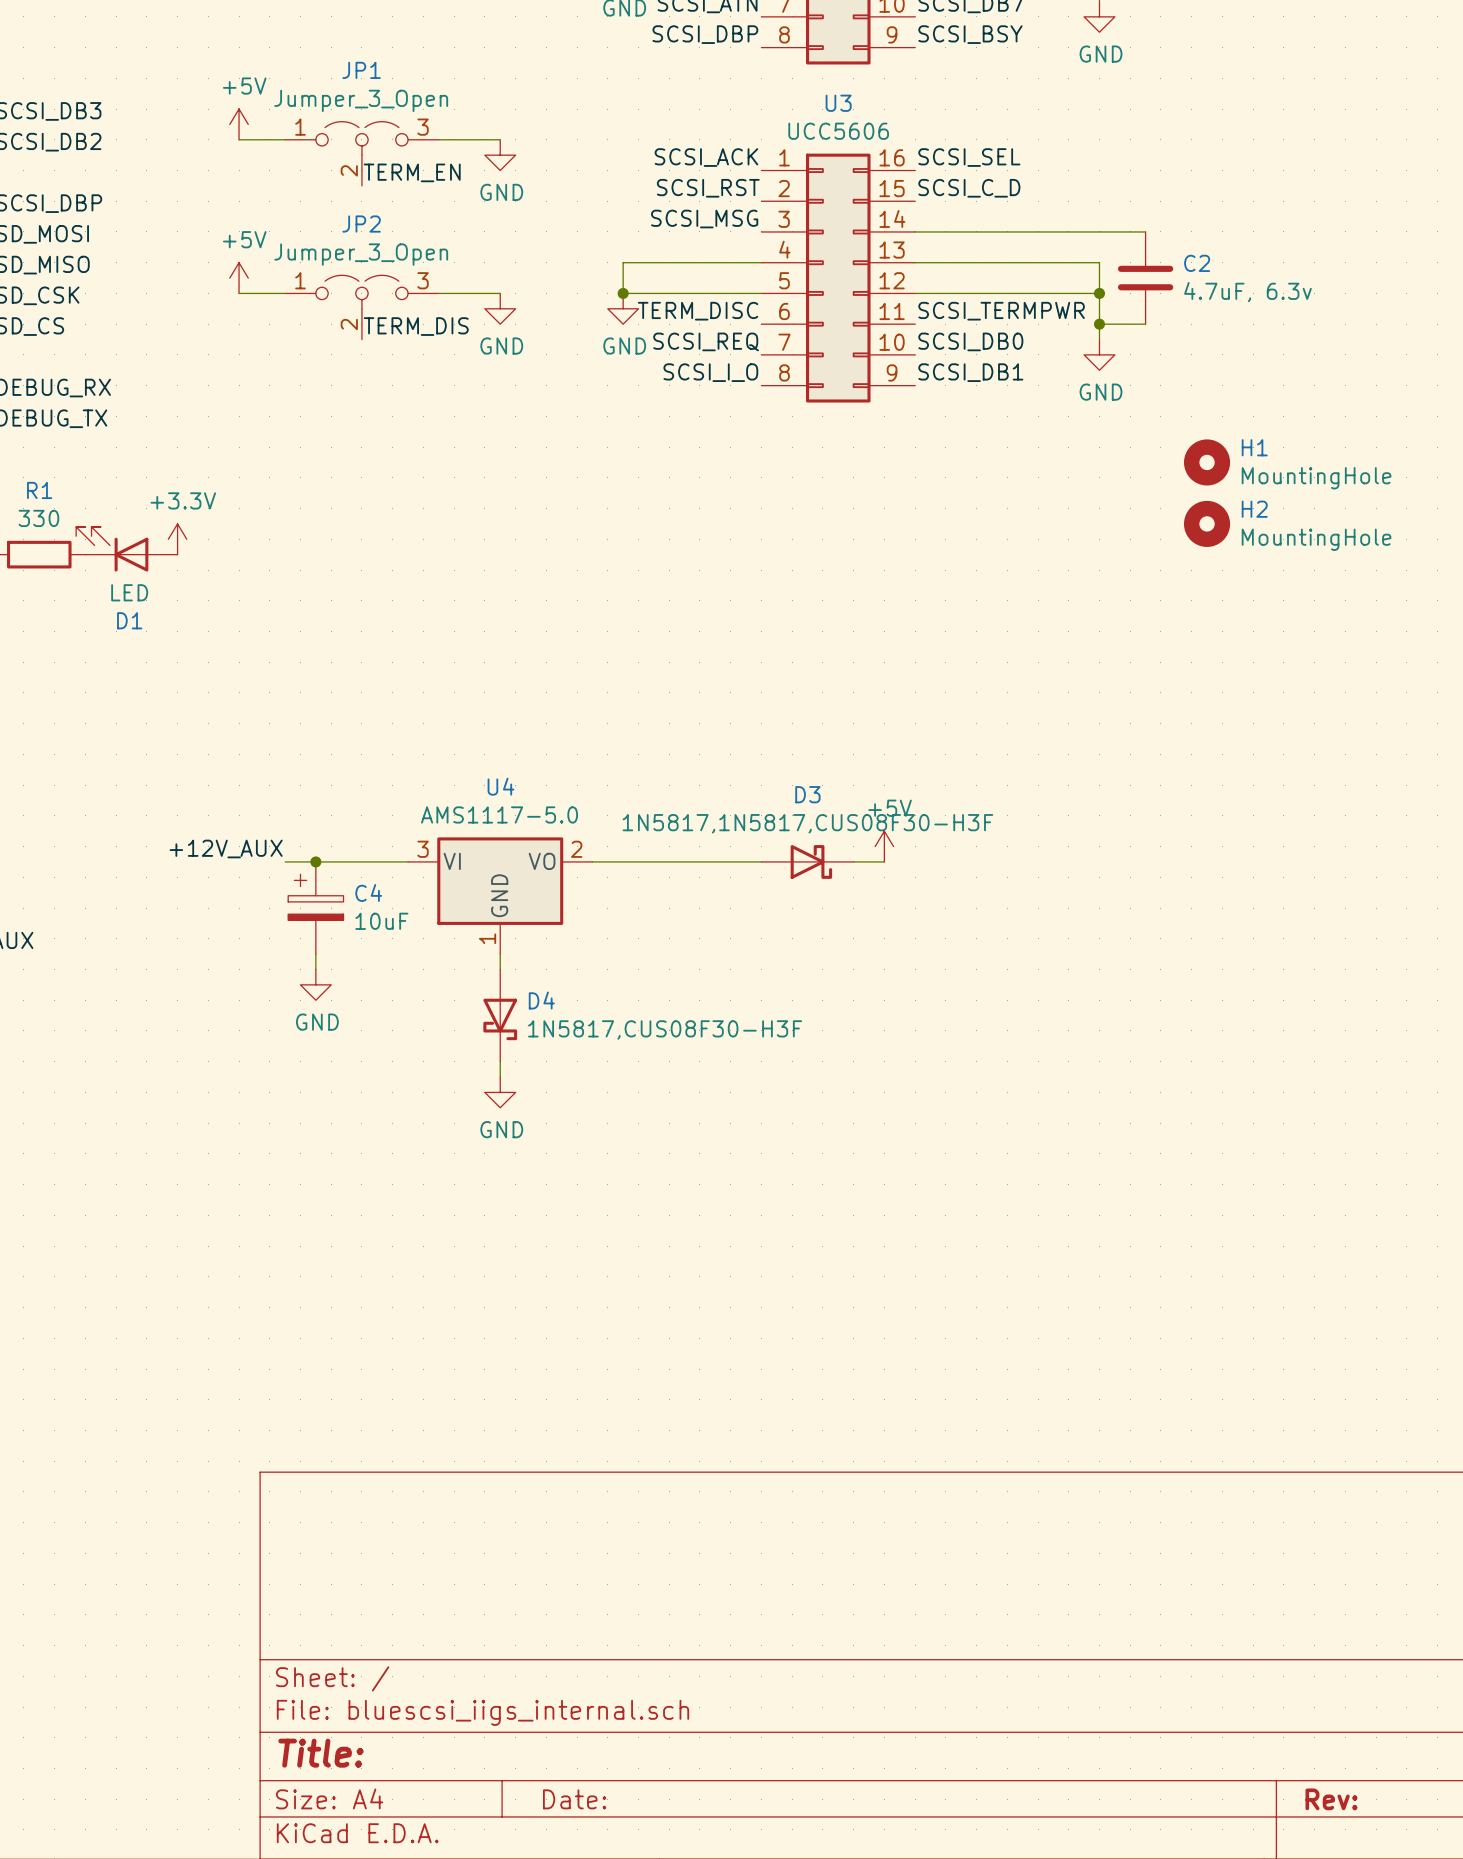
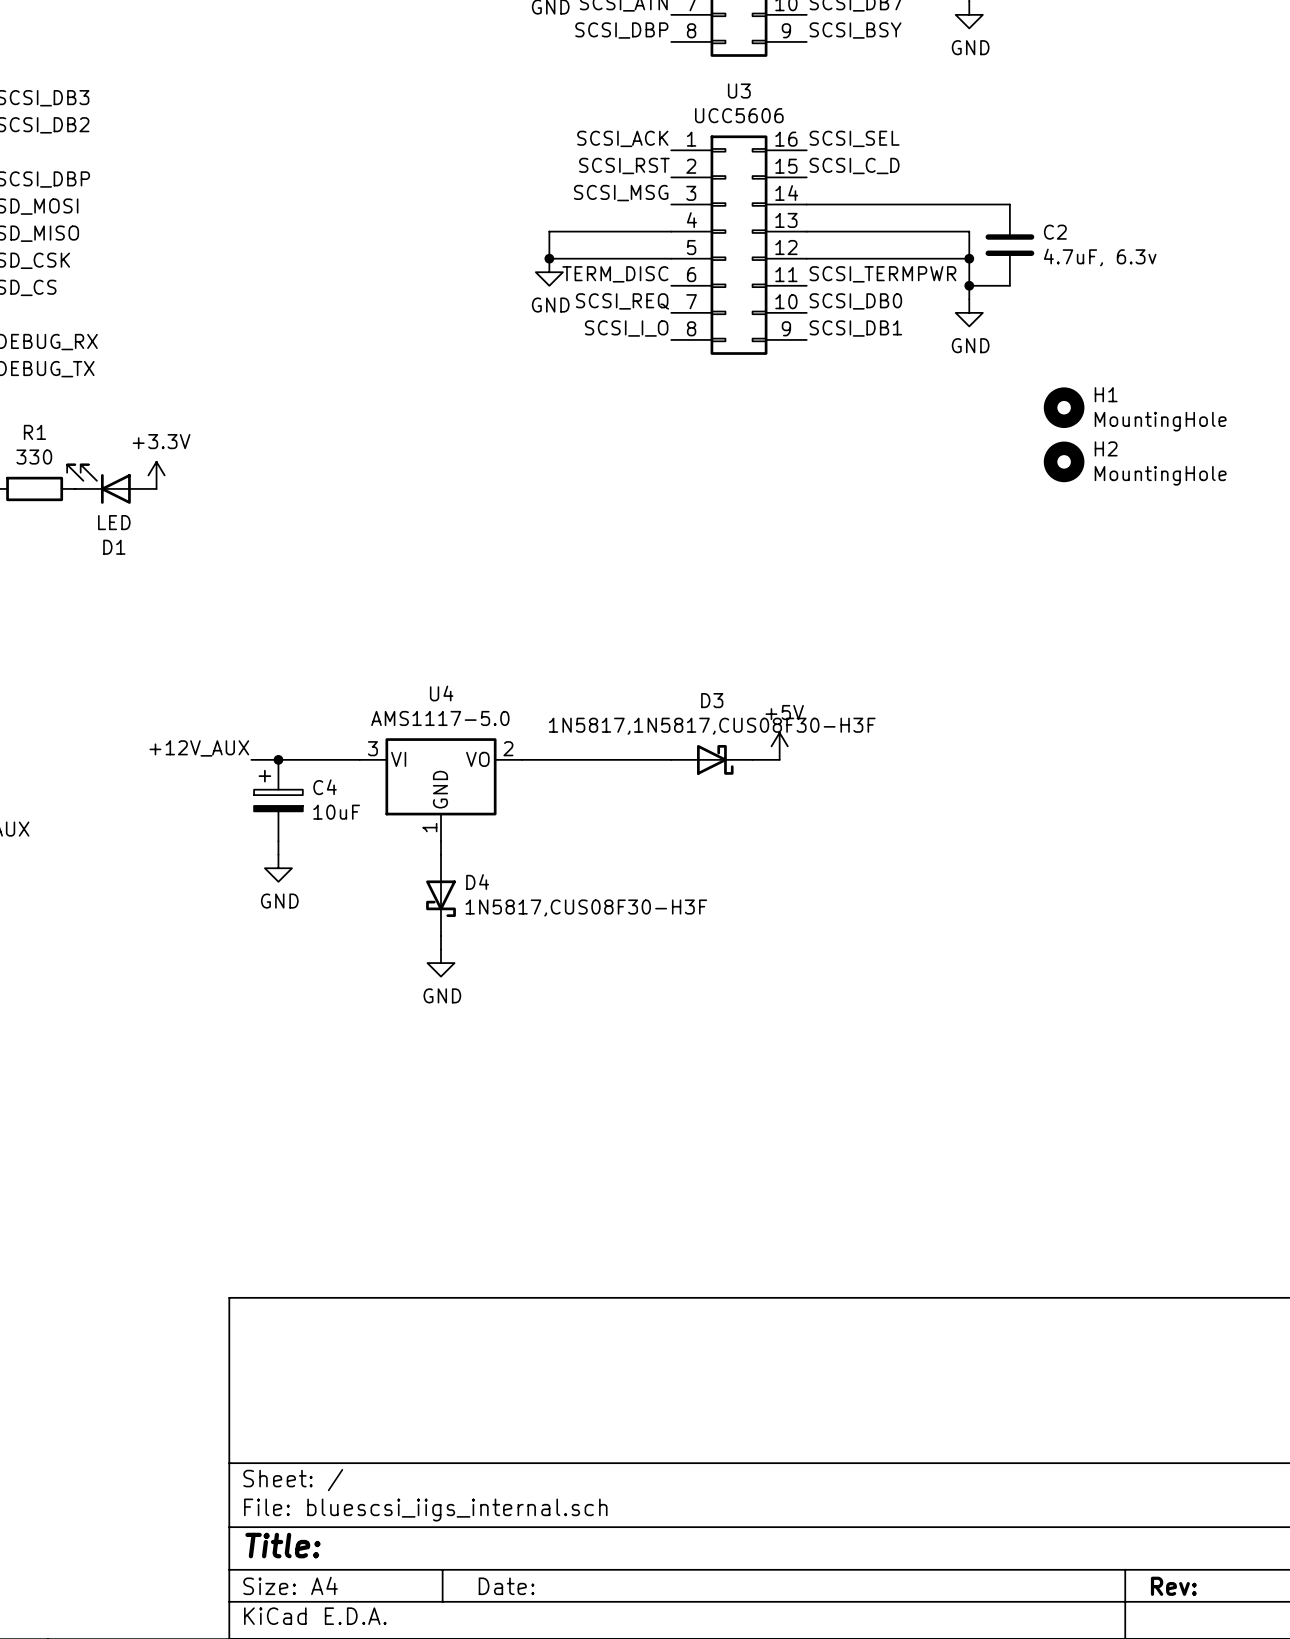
power symbol: +5V (239, 124) -> none
wire: (239, 139) (285, 139) -> none
wire: (438, 139) (500, 139) -> none
JP1: Jumper_3_Open (361, 153) -> none
power symbol: GND (500, 155) -> none
label: TERM_EN (412, 172) -> none
power symbol: +5V (239, 278) -> none
wire: (239, 293) (285, 293) -> none
wire: (438, 293) (500, 293) -> none
JP2: Jumper_3_Open (361, 307) -> none
power symbol: GND (500, 308) -> none
label: TERM_DIS (416, 326) -> none

